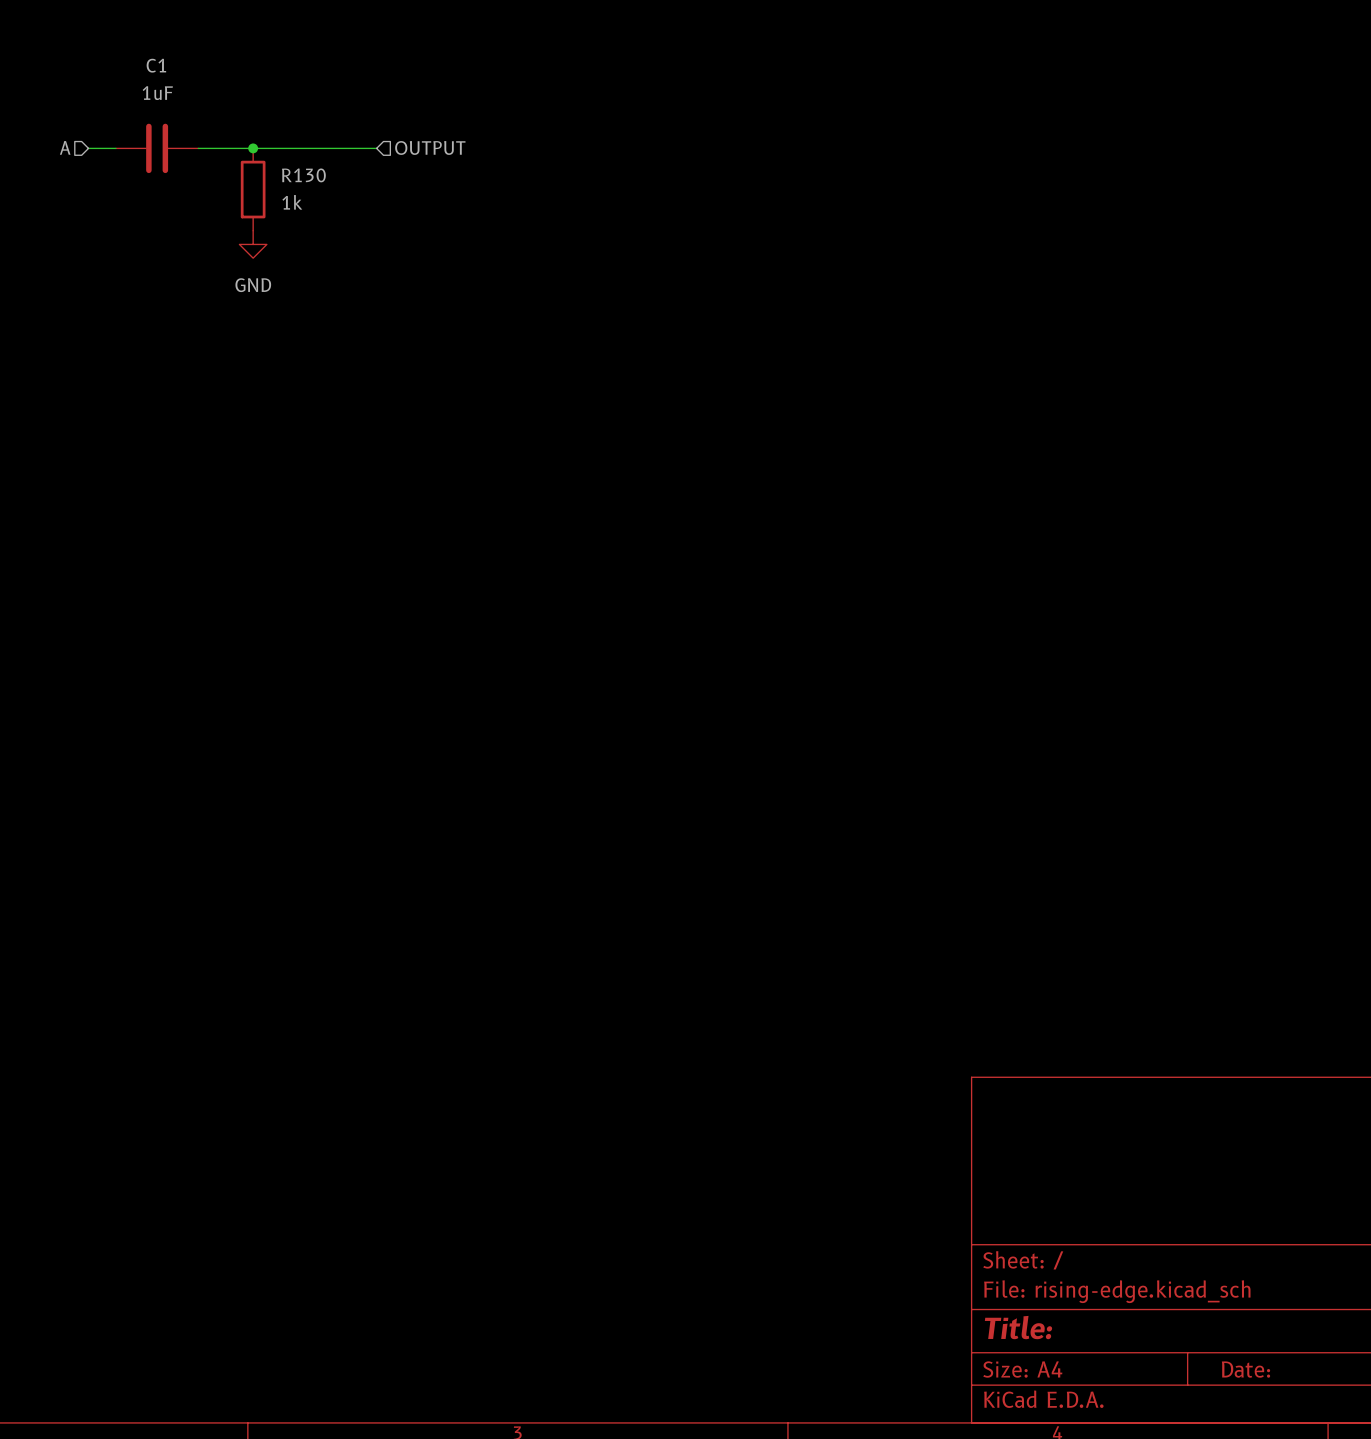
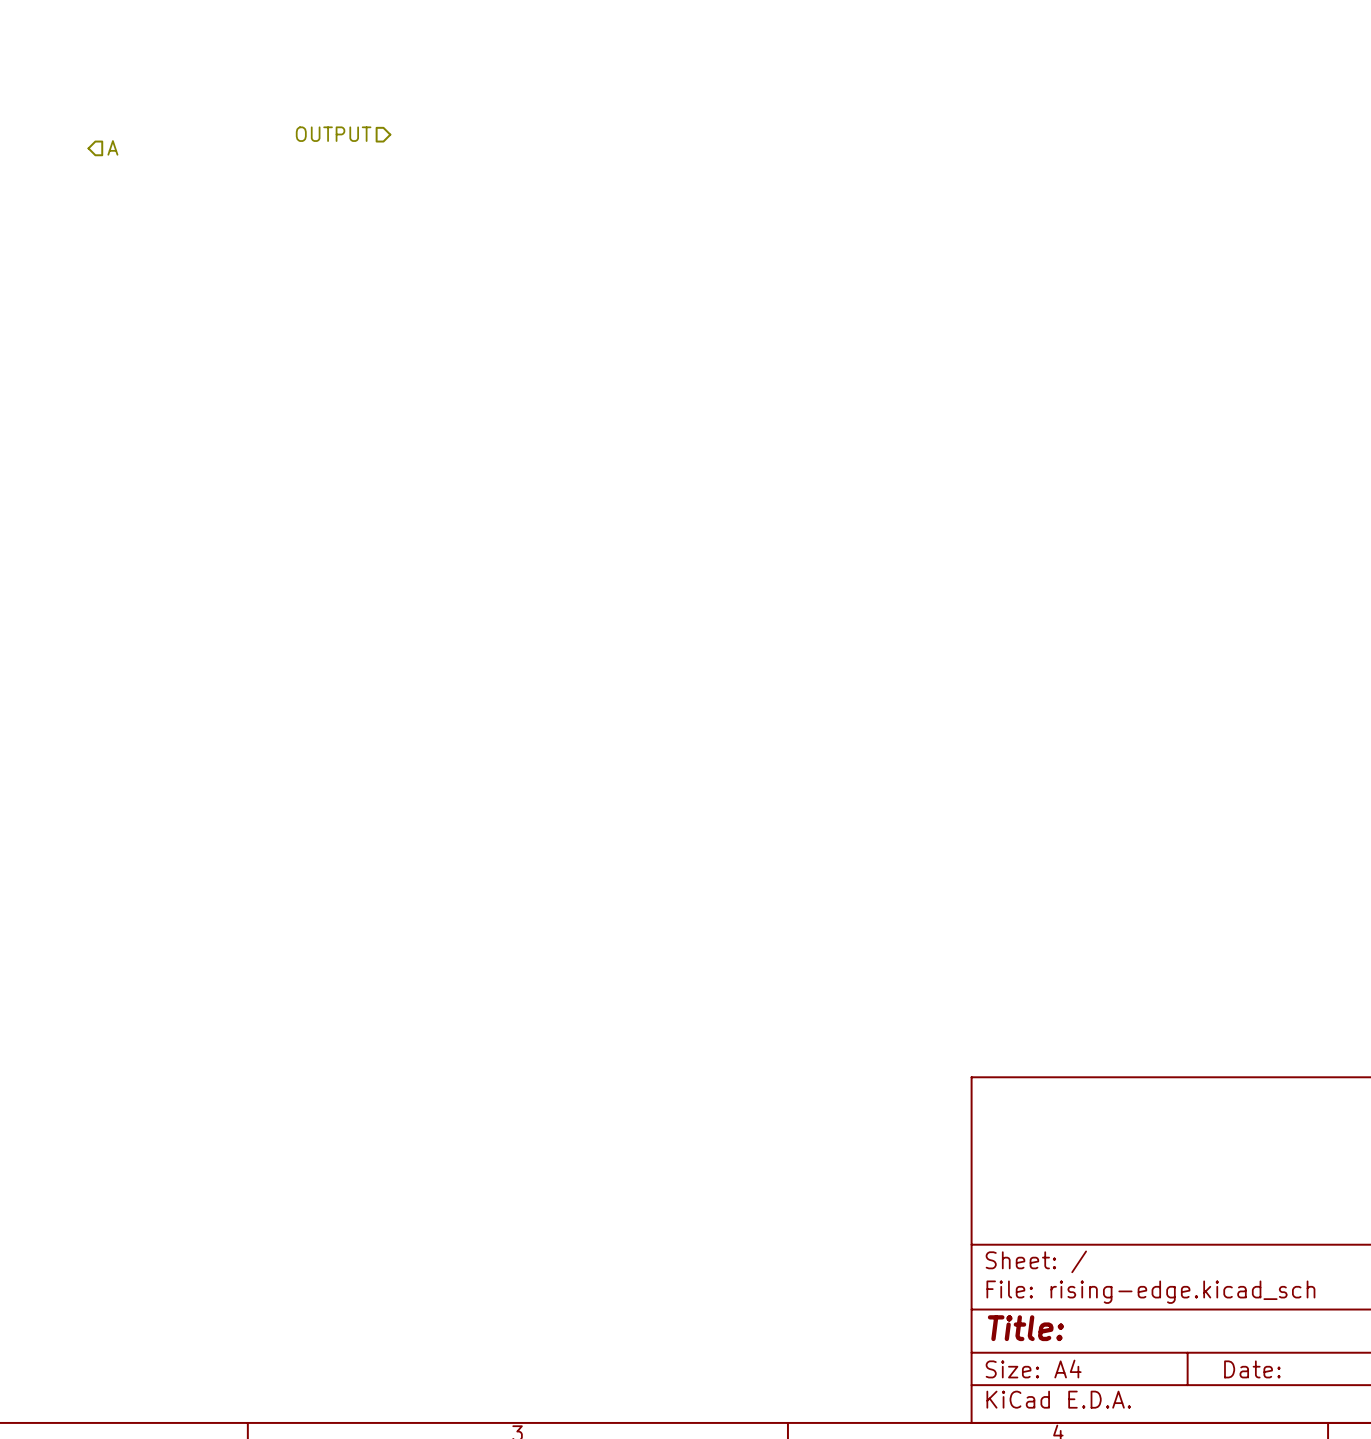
hierarchical label rotation: 0° (65, 147) -> 180° (112, 147)
hierarchical label position: A (65, 147) -> A (112, 147)
hierarchical label rotation: 0° (430, 147) -> 180° (333, 134)
hierarchical label position: OUTPUT (430, 147) -> OUTPUT (333, 134)
wire: (88, 148) (115, 148) -> none
C1: 1uF (157, 148) -> none
wire: (198, 148) (376, 148) -> none
junction: (253, 148) -> none
R130: 1k (253, 189) -> none
power symbol: GND (253, 244) -> none

